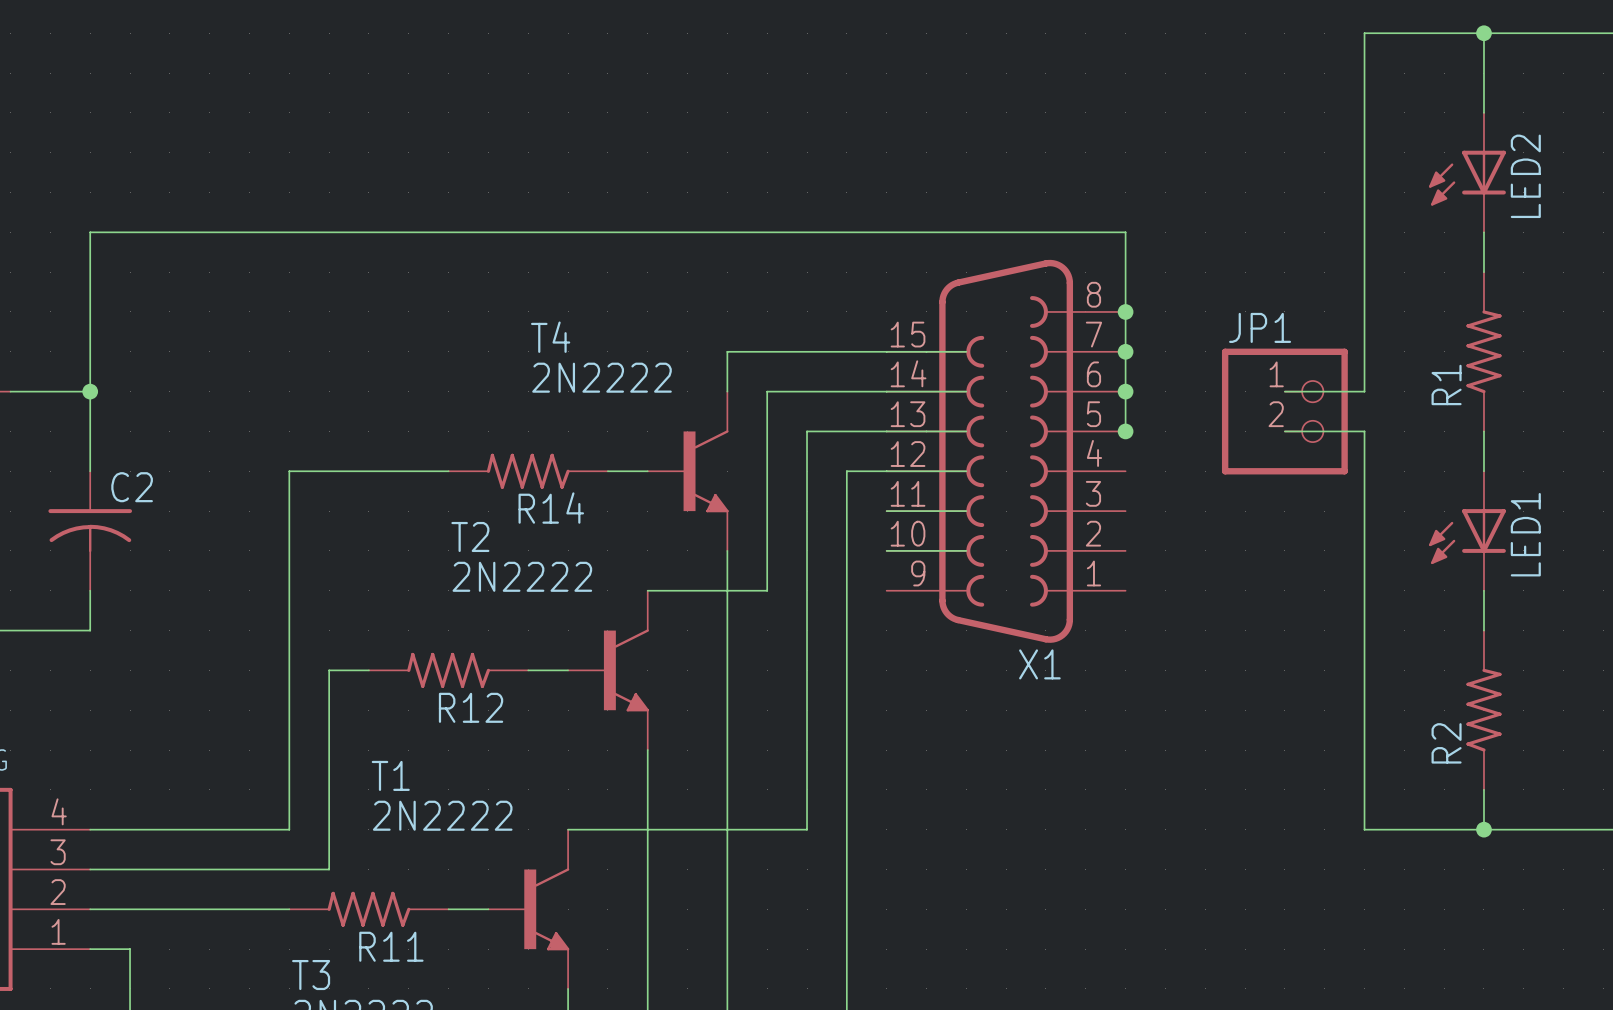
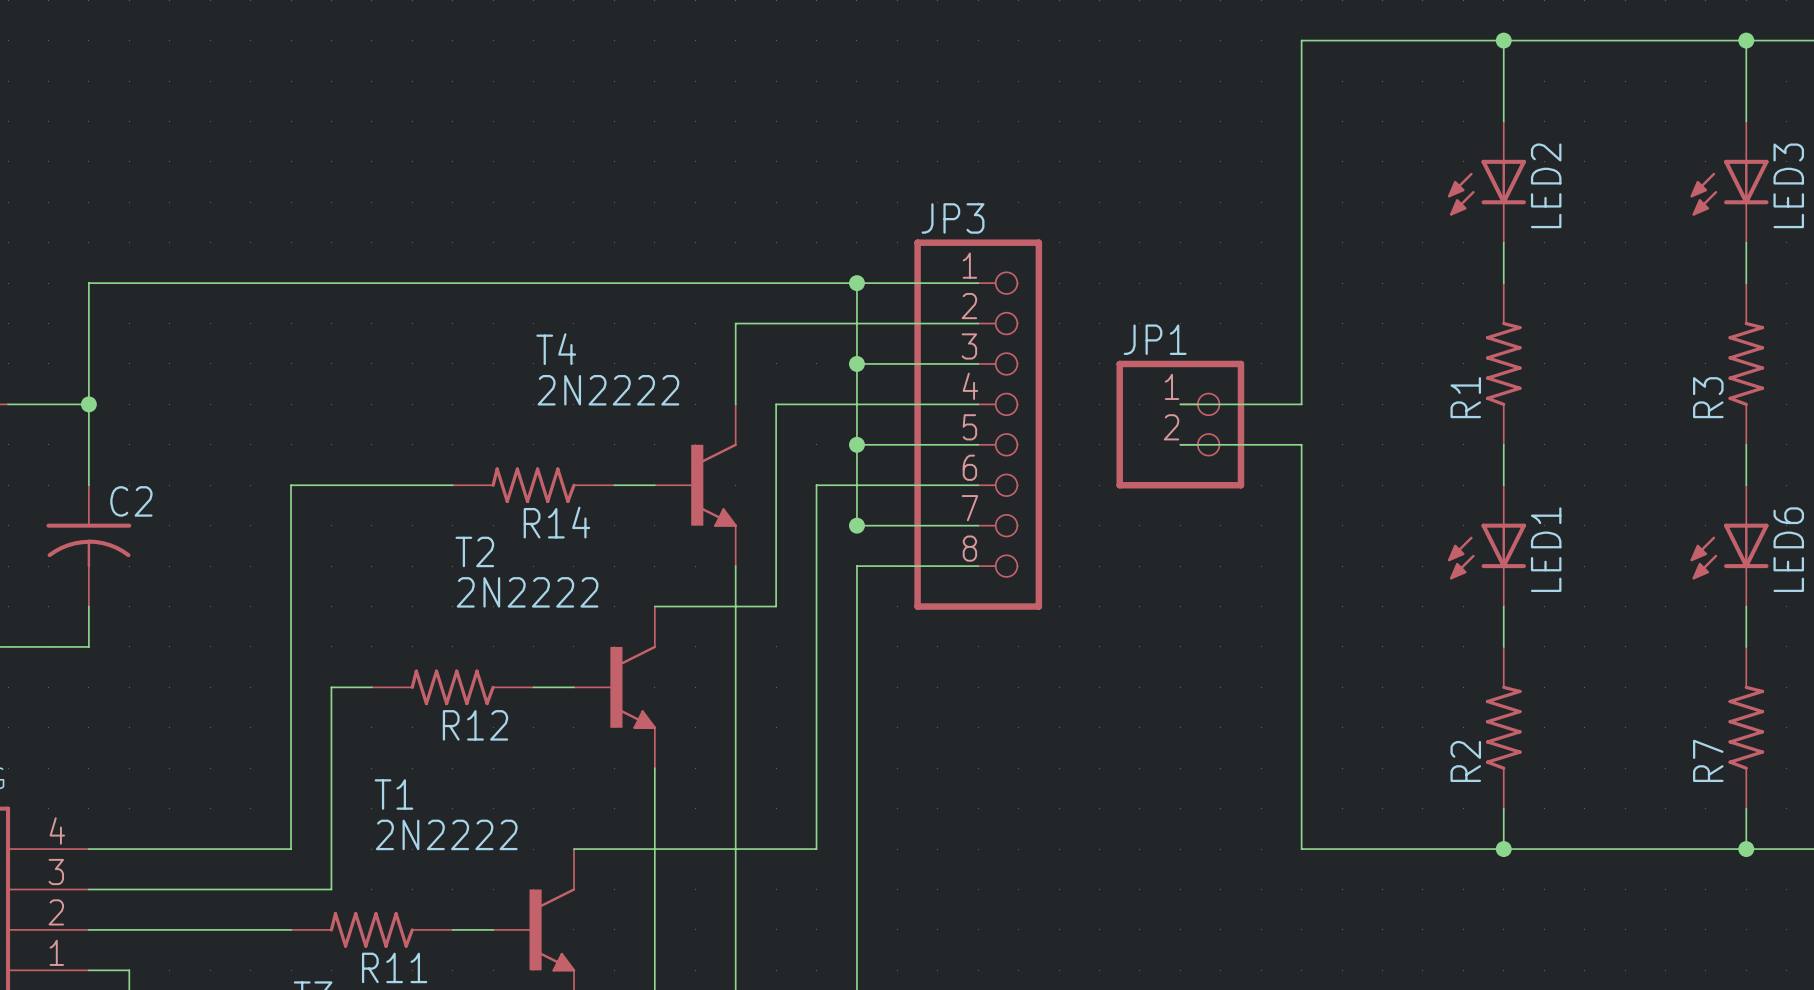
wire: (1364, 33) (1364, 391) (1284, 391) -> (1382, 40) (1301, 40) (1301, 404) (1180, 404)
wire: (90, 272) (90, 232) (1125, 232) (1125, 431) -> (88, 283) (978, 283)
junction: none -> (856, 283)
junction: (1125, 311) -> none
wire: (727, 351) (846, 351) -> (735, 363) (735, 323) (978, 323)
junction: none -> (856, 363)
junction: (1125, 351) -> none
junction: (1125, 391) -> none
JP3: none -> (978, 424)
JP1 position: (1284, 411) -> (1180, 424)
wire: (846, 431) (807, 431) (807, 471) -> (856, 283) (856, 485) (816, 485)
junction: none -> (856, 444)
junction: (1125, 431) -> none
wire: (1284, 431) (1364, 431) (1364, 829) -> (1180, 444) (1301, 444) (1301, 849) (1382, 849)
X1: (1006, 451) -> none
wire: (846, 511) (846, 550) -> (856, 525) (897, 525)
junction: none -> (856, 525)
wire: none -> (856, 566) (897, 566)

